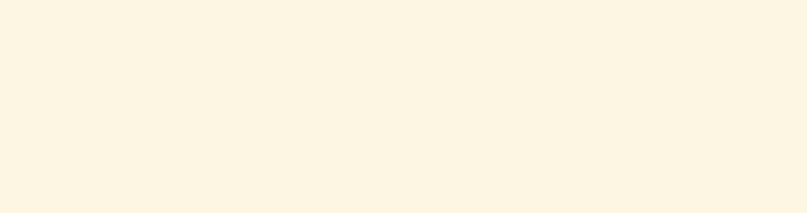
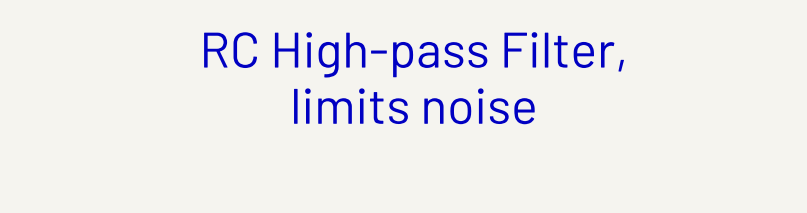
text: none -> RC High-pass Filter, (414, 54)
text: none -> limits noise (414, 106)

